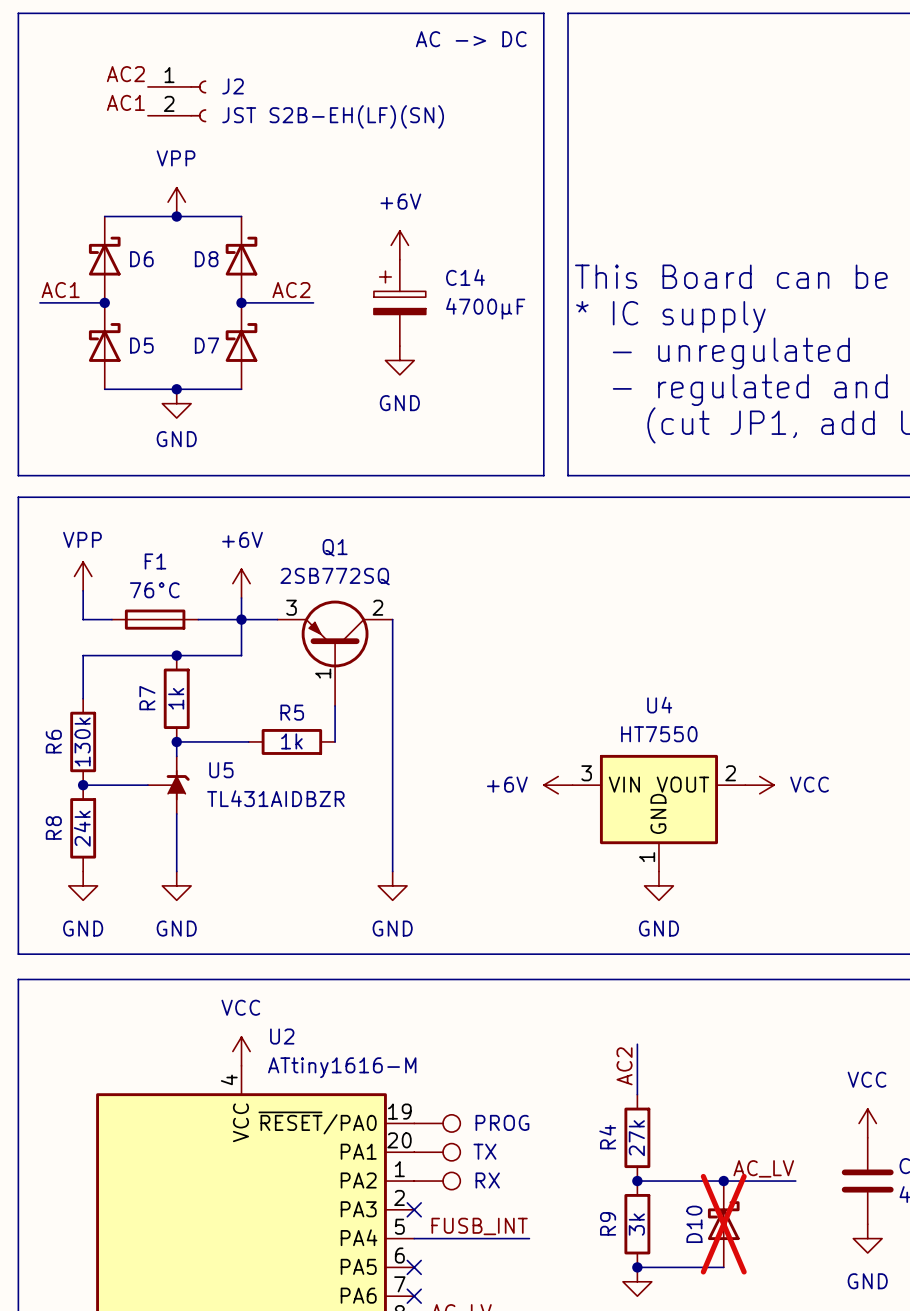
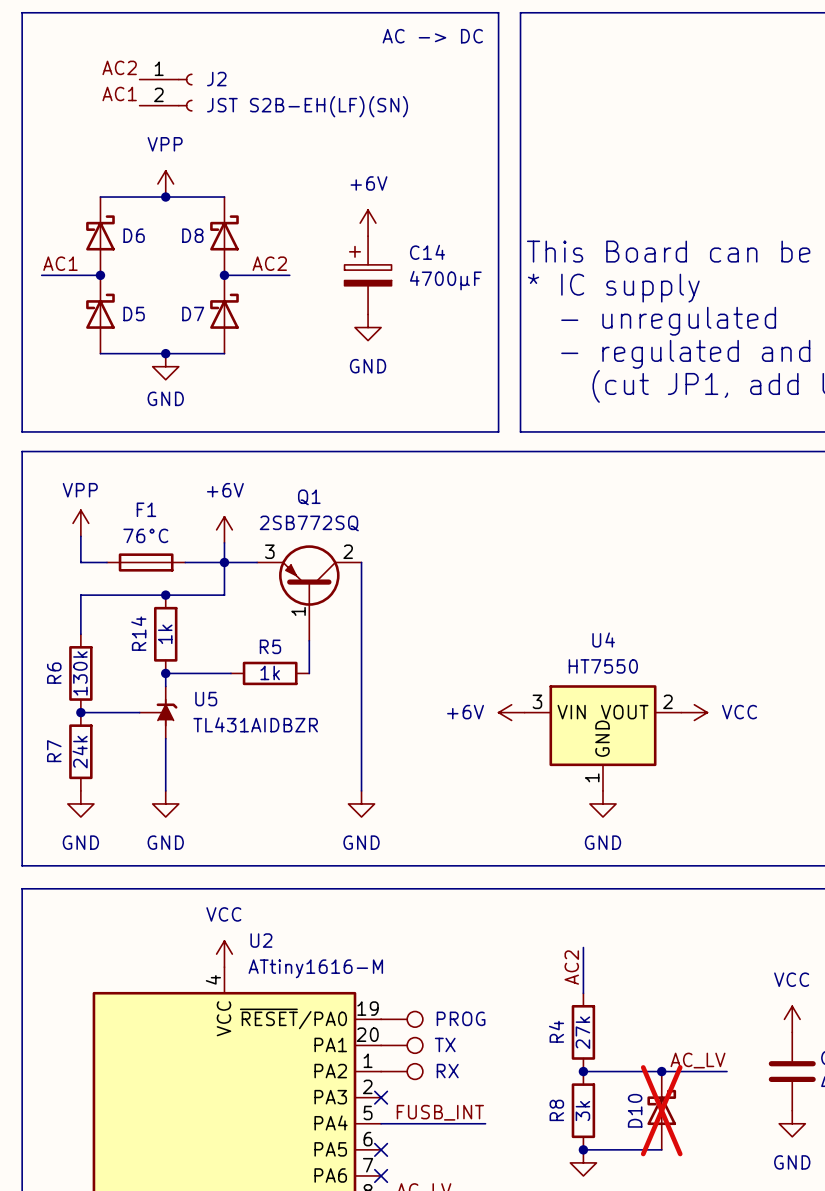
R7 name: R7 (147, 698) -> R14 (138, 633)
R8 name: R8 (53, 827) -> R7 (54, 751)
R9 name: R9 (608, 1223) -> R8 (556, 1110)

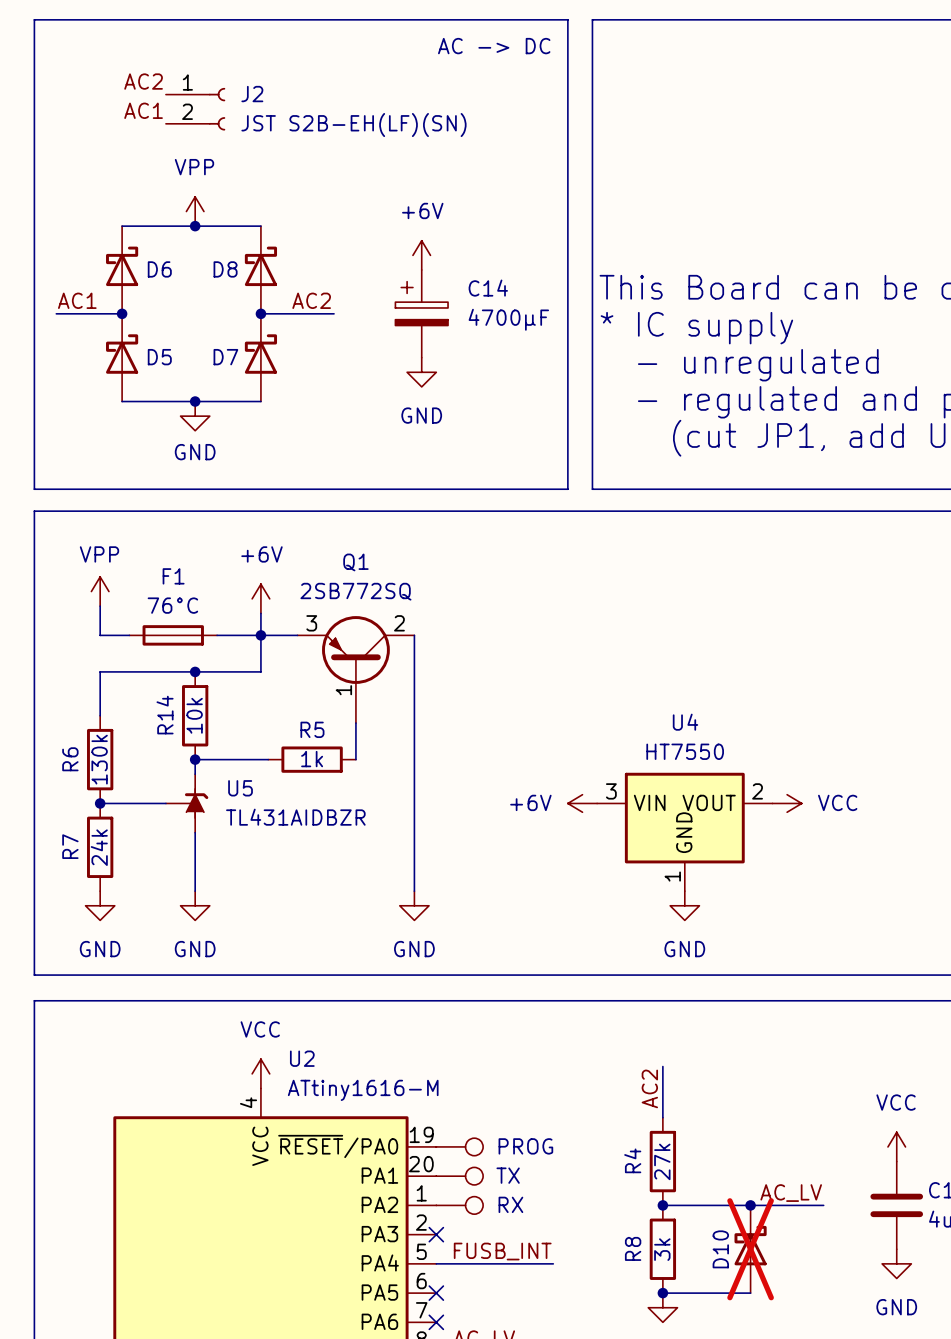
R14 value: 1k (165, 634) -> 10k (194, 715)

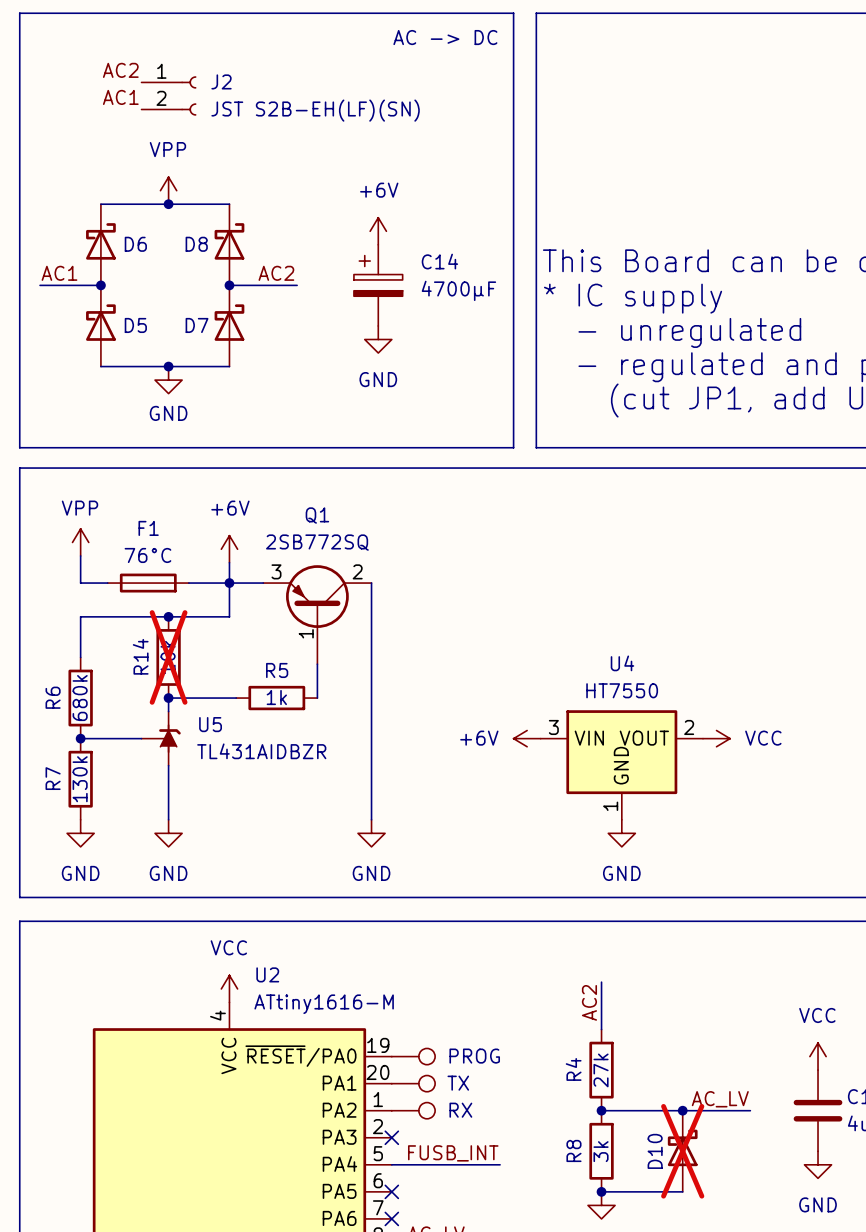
R14 do-not-place cross: none -> (168, 657)
R6 value: 130k (99, 759) -> 680k (80, 698)
R7 value: 24k (99, 847) -> 130k (80, 779)

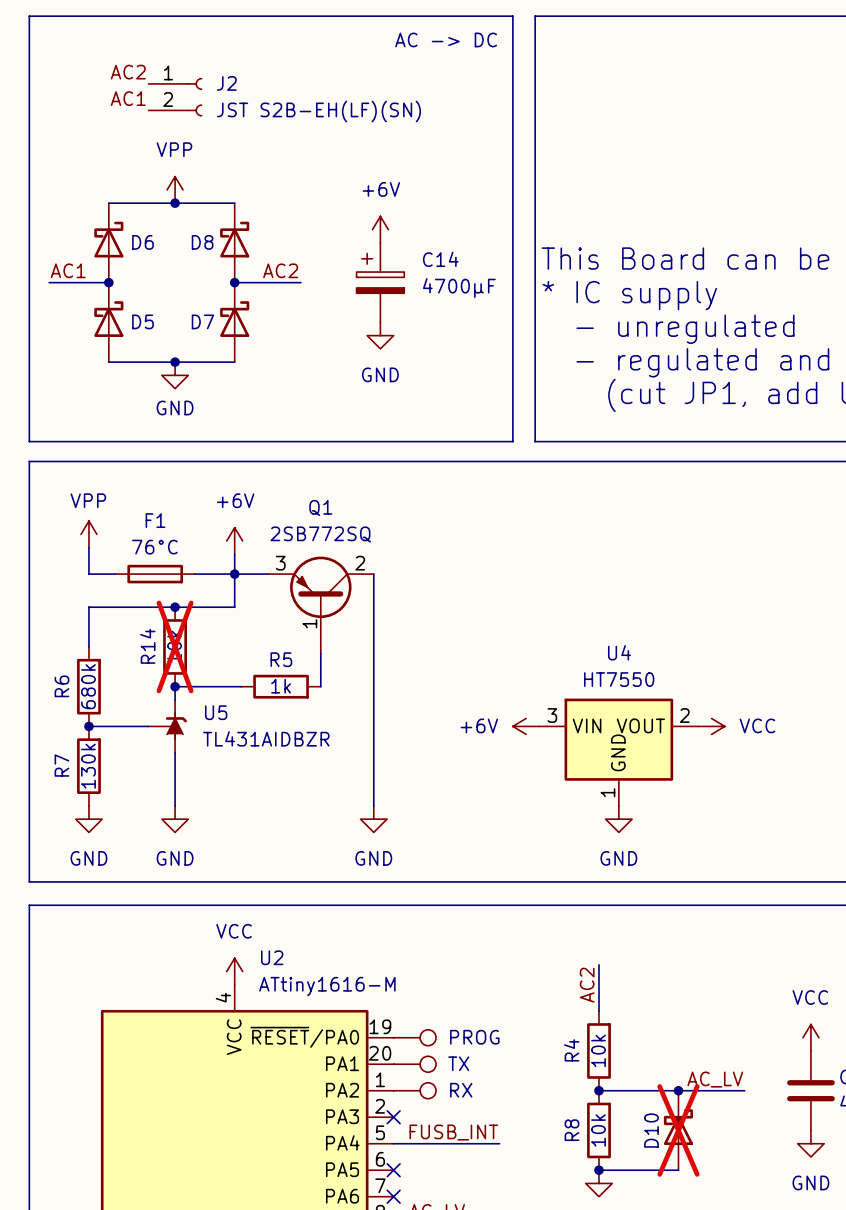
R4 value: 27k (601, 1070) -> 10k (598, 1050)
R8 value: 3k (601, 1151) -> 10k (598, 1130)

